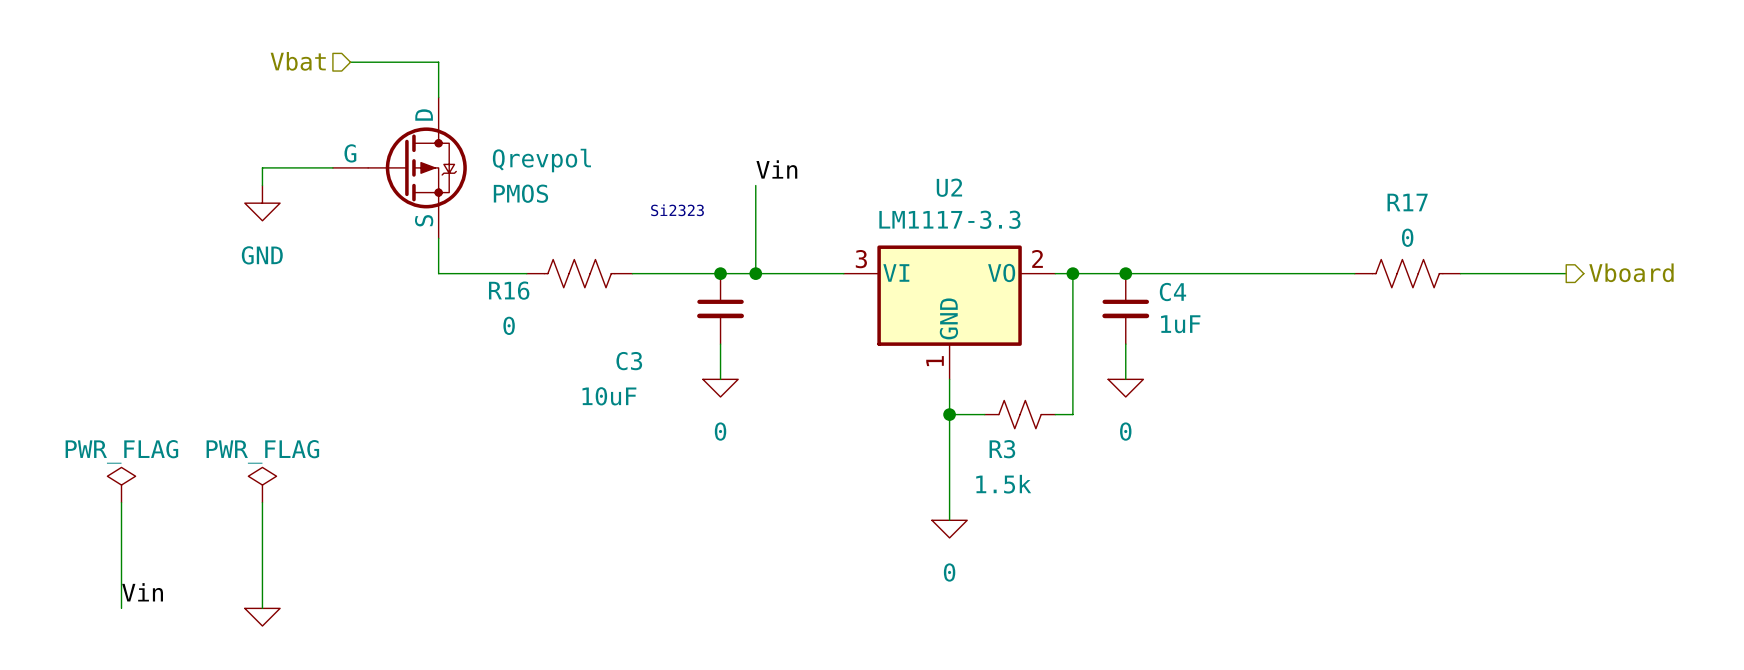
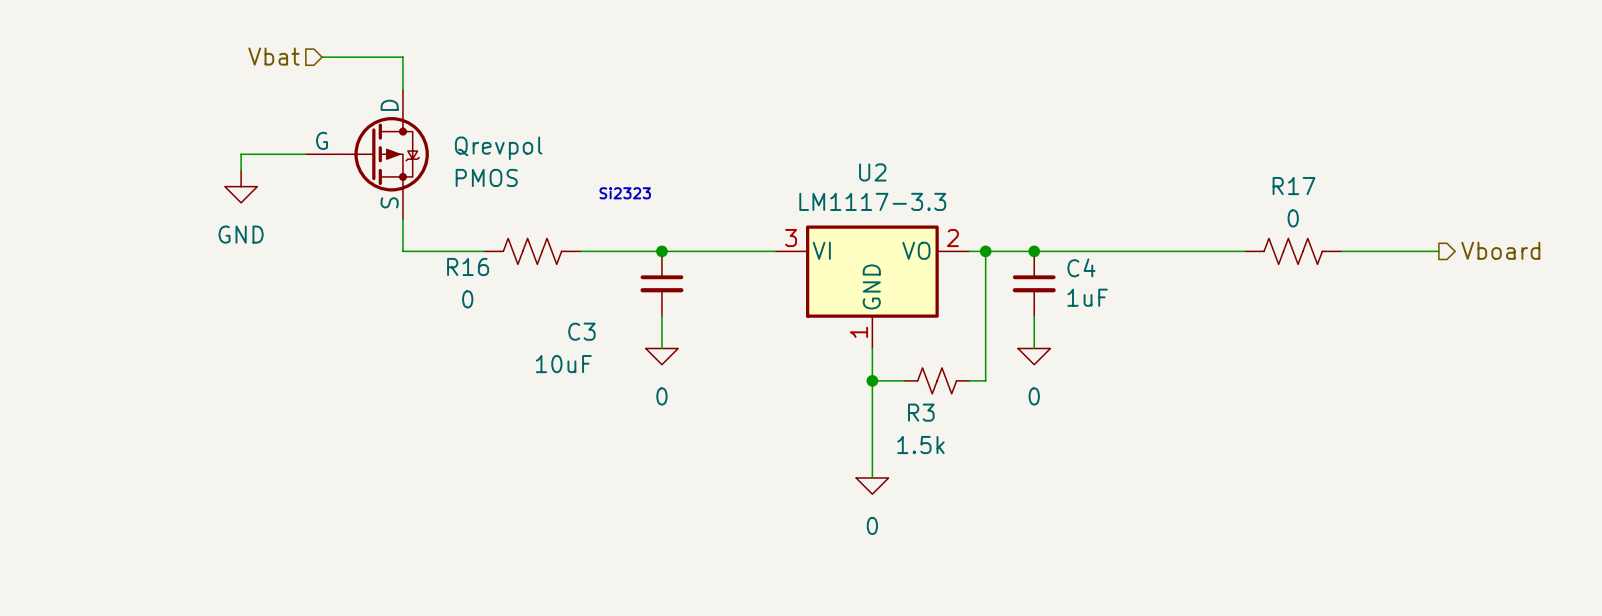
label: Vin (776, 169) -> none
wire: (755, 185) (755, 273) -> none
junction: (755, 273) -> none
power symbol: PWR_FLAG (121, 485) -> none
power symbol: PWR_FLAG (262, 485) -> none
wire: (121, 502) (121, 608) -> none
wire: (262, 502) (262, 608) -> none
label: Vin (142, 592) -> none
power symbol: (262, 617) -> none

